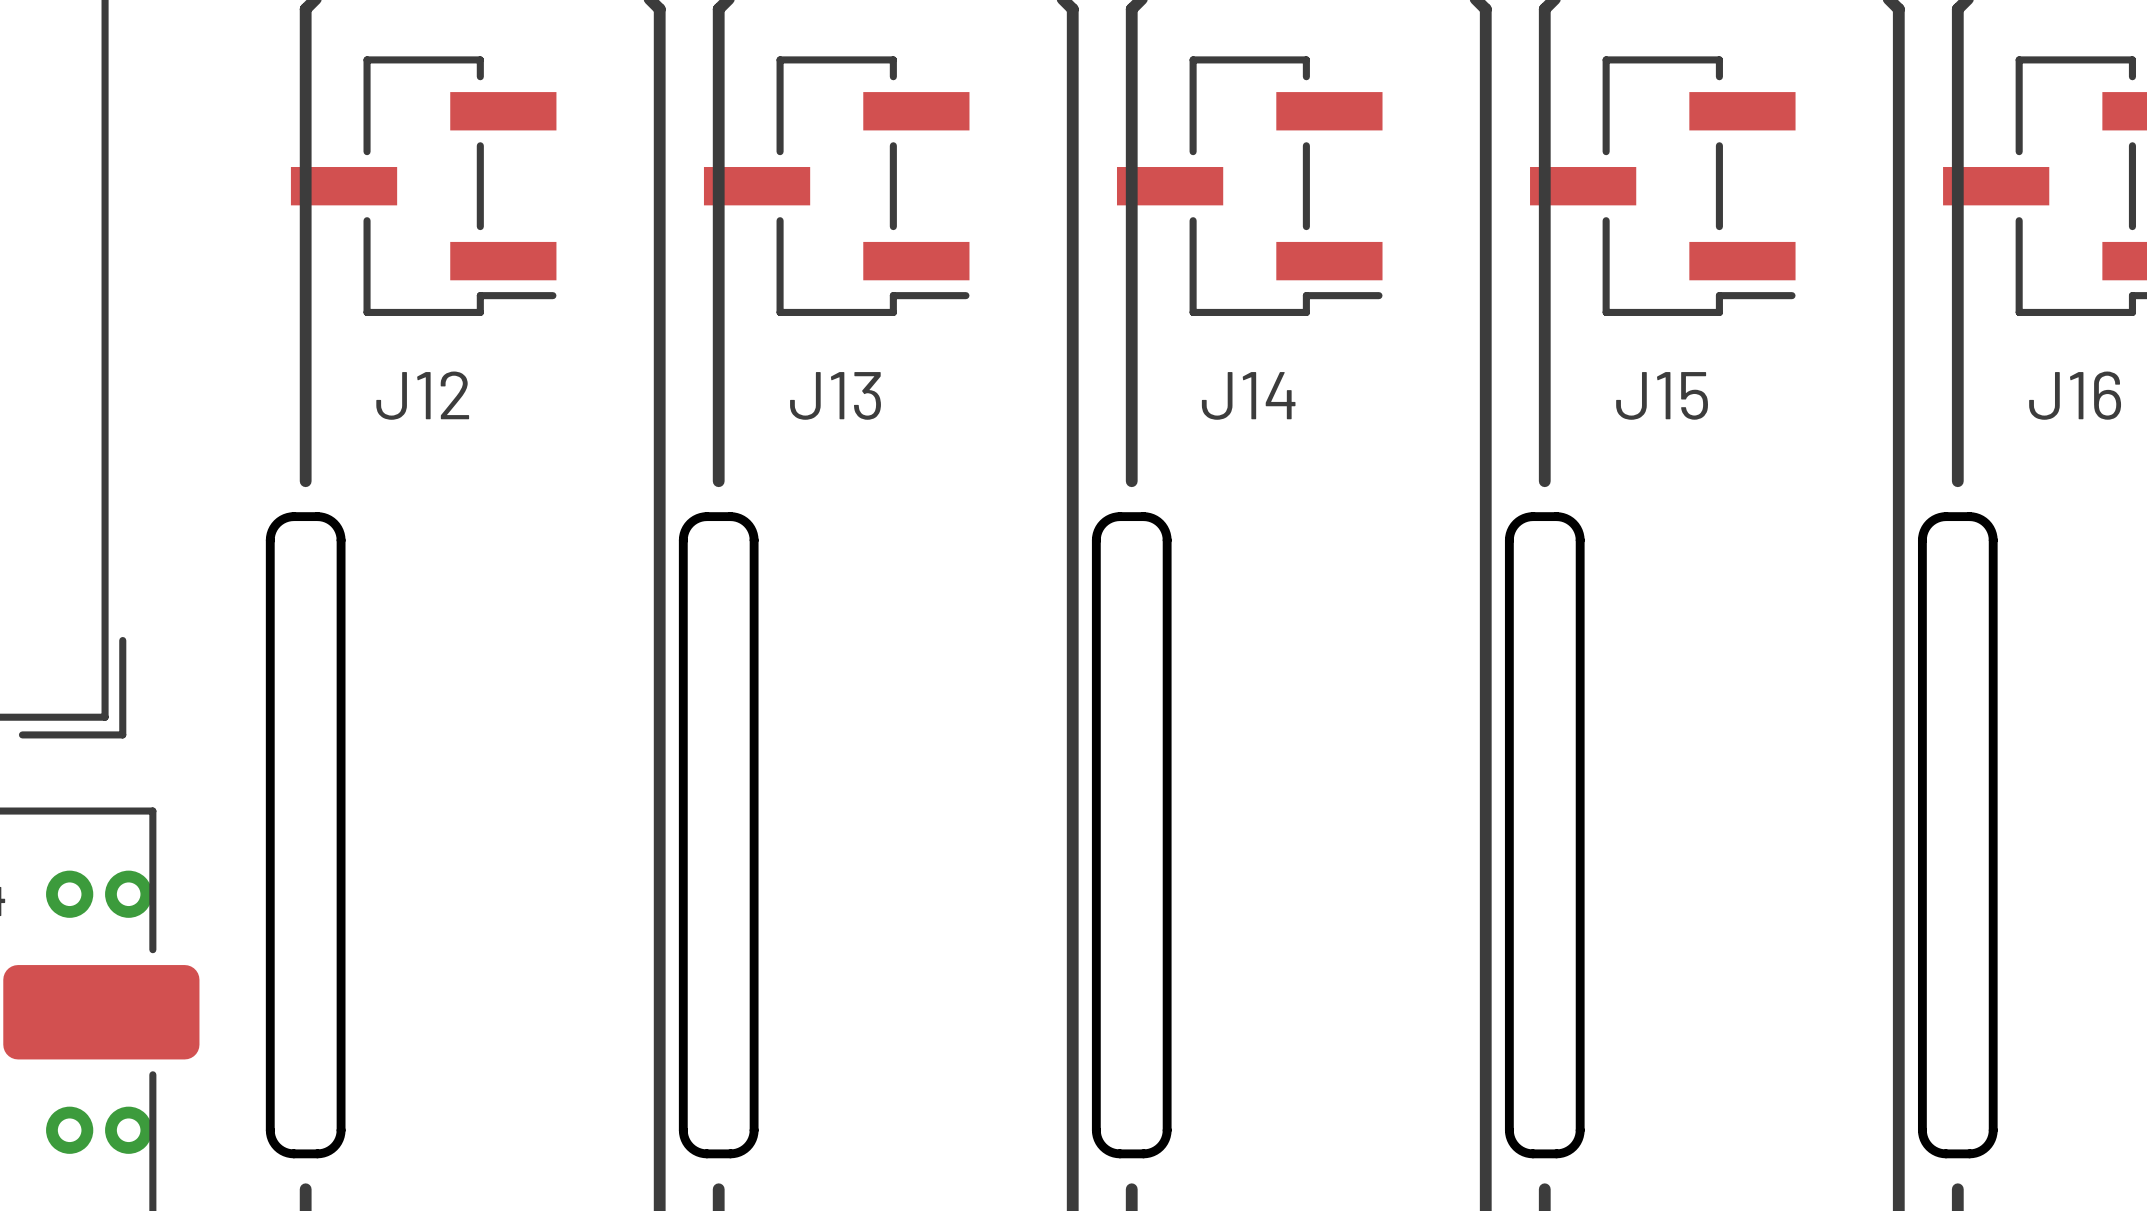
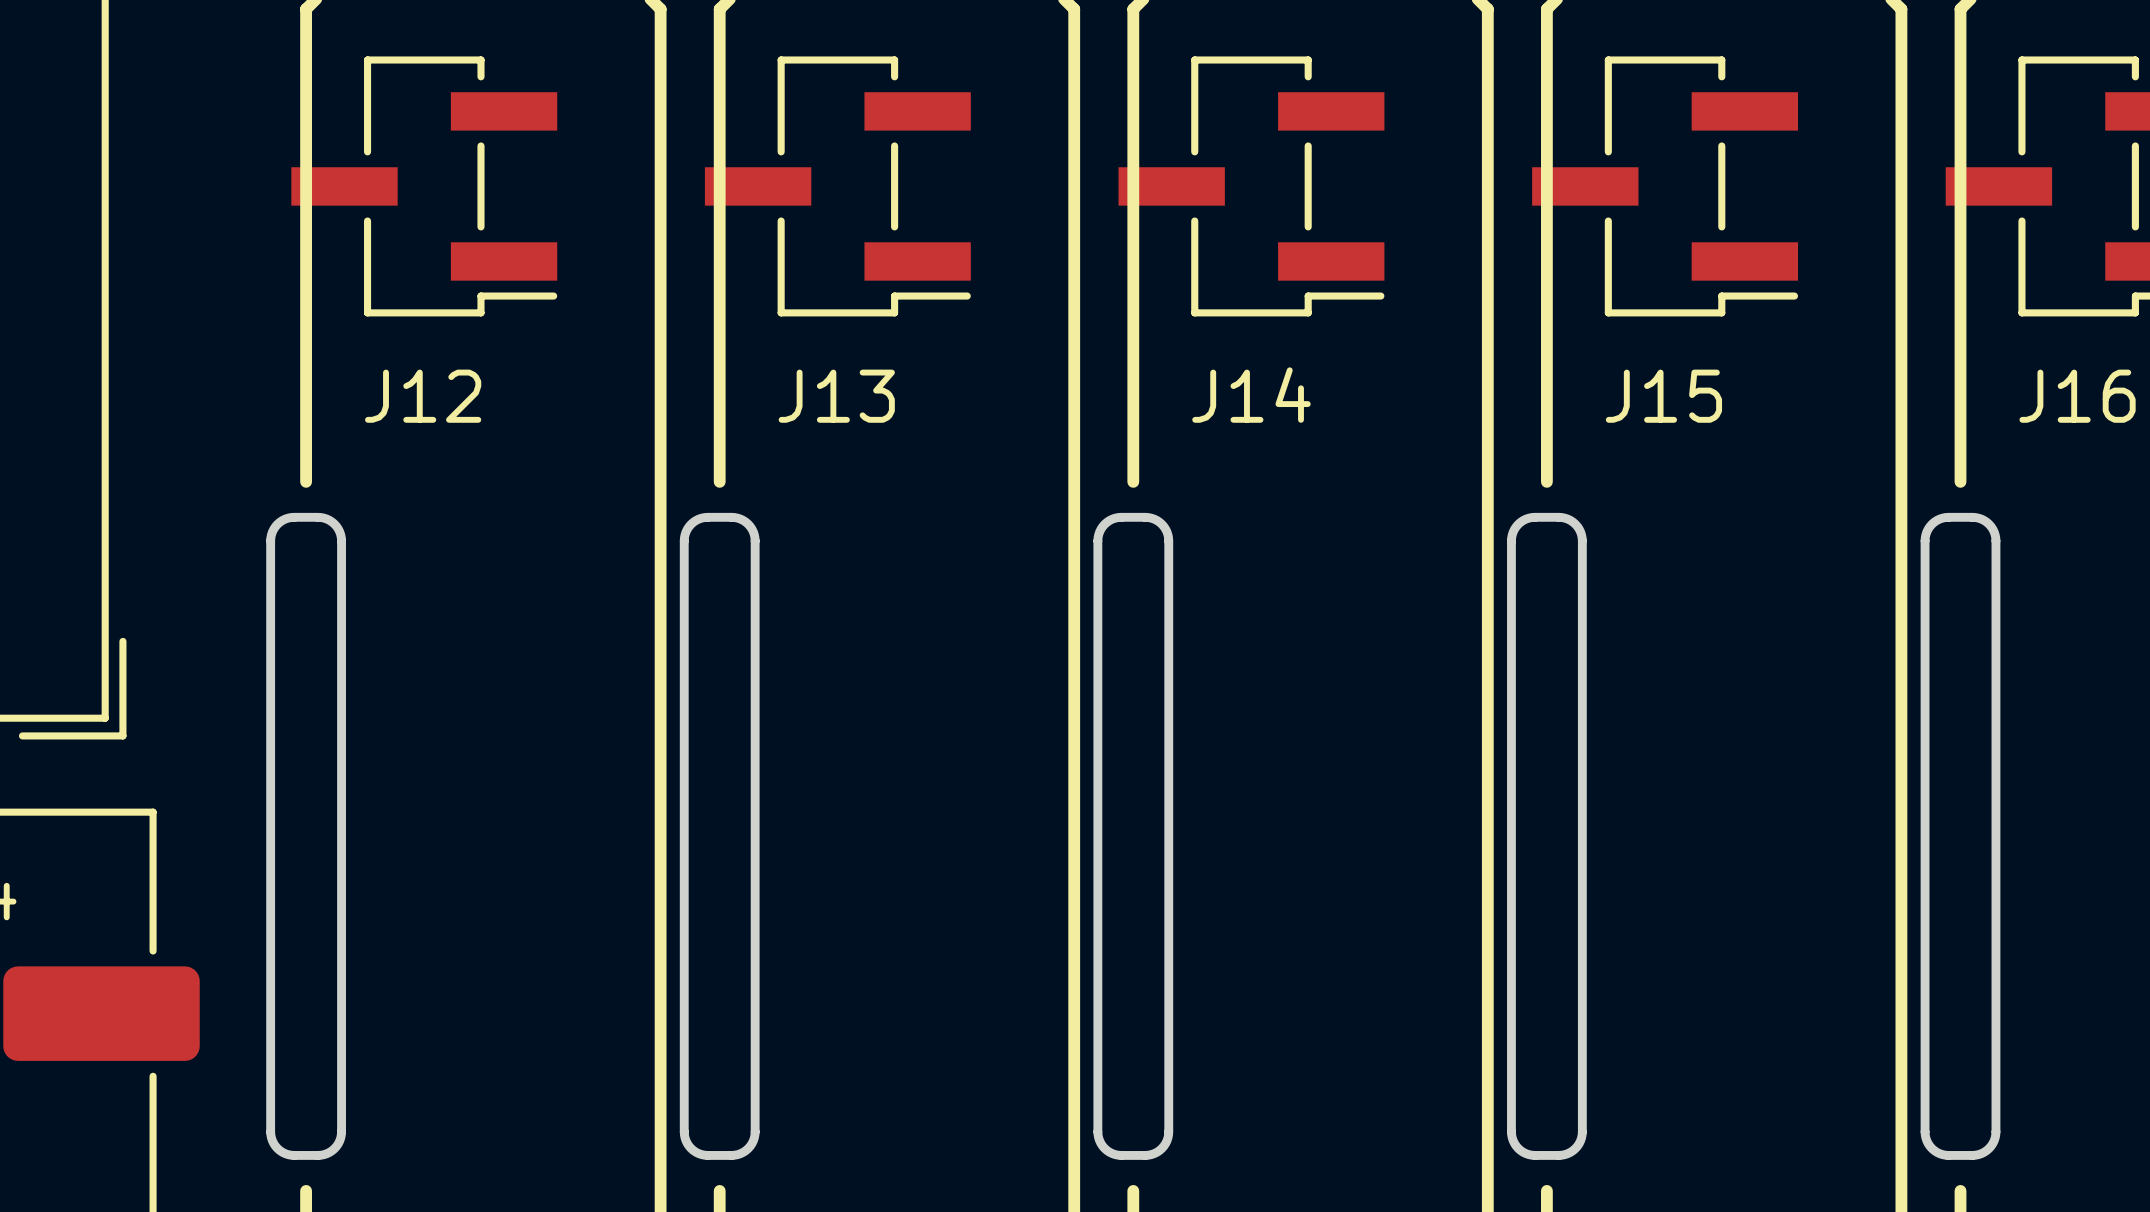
via: (69, 894) -> none
via: (128, 894) -> none
via: (69, 1130) -> none
via: (128, 1130) -> none

